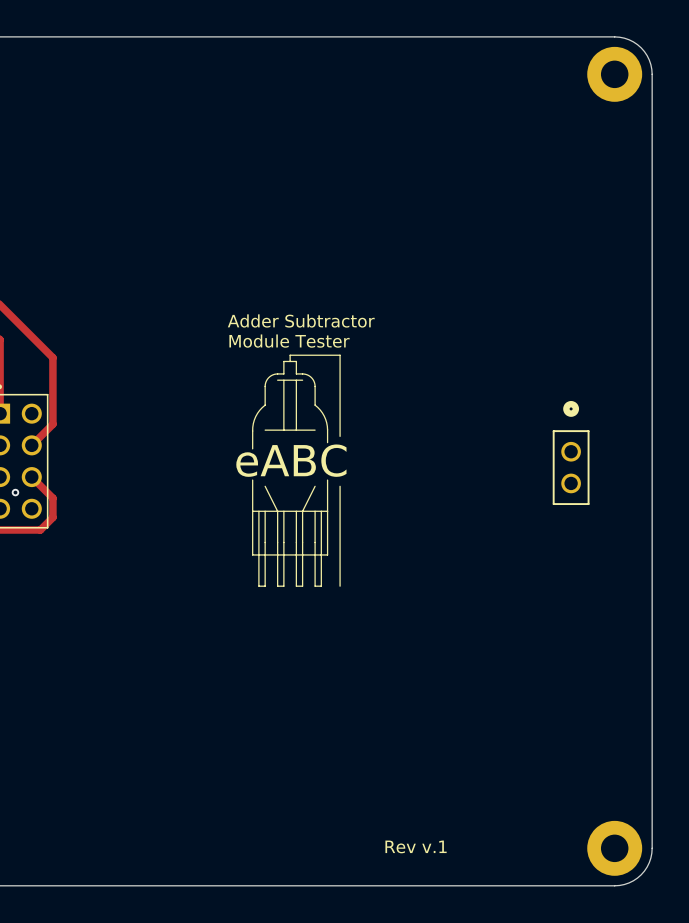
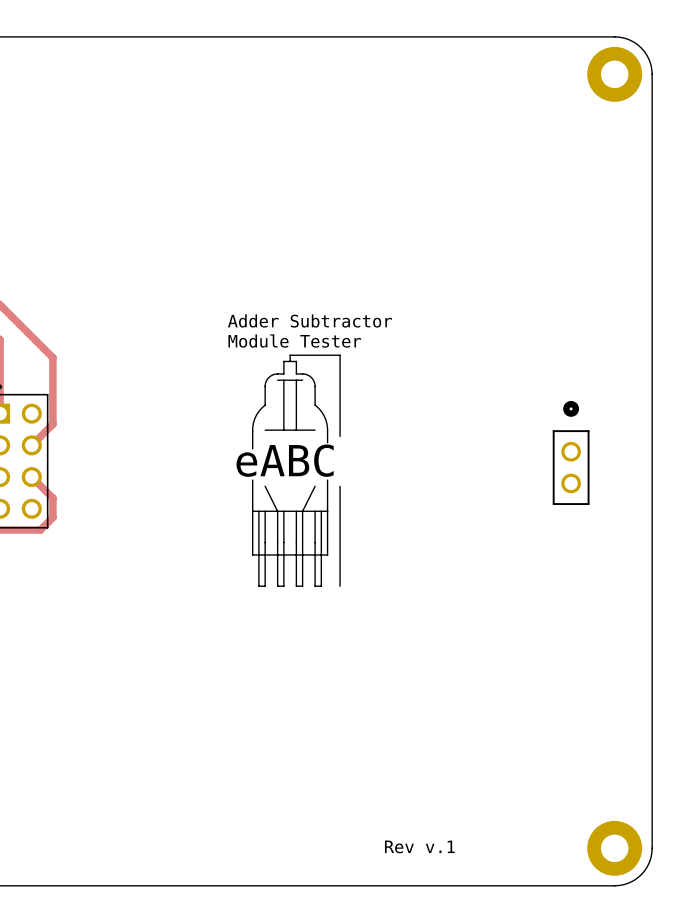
via: (15, 492) -> none

